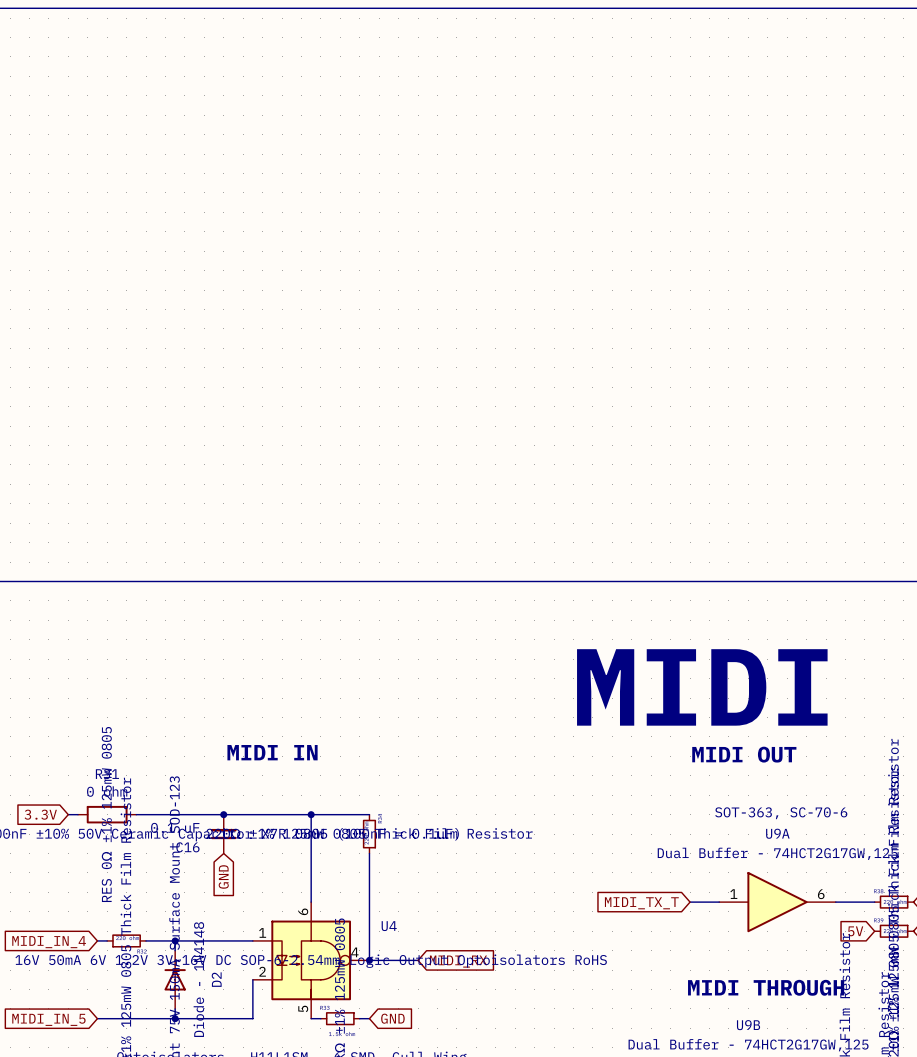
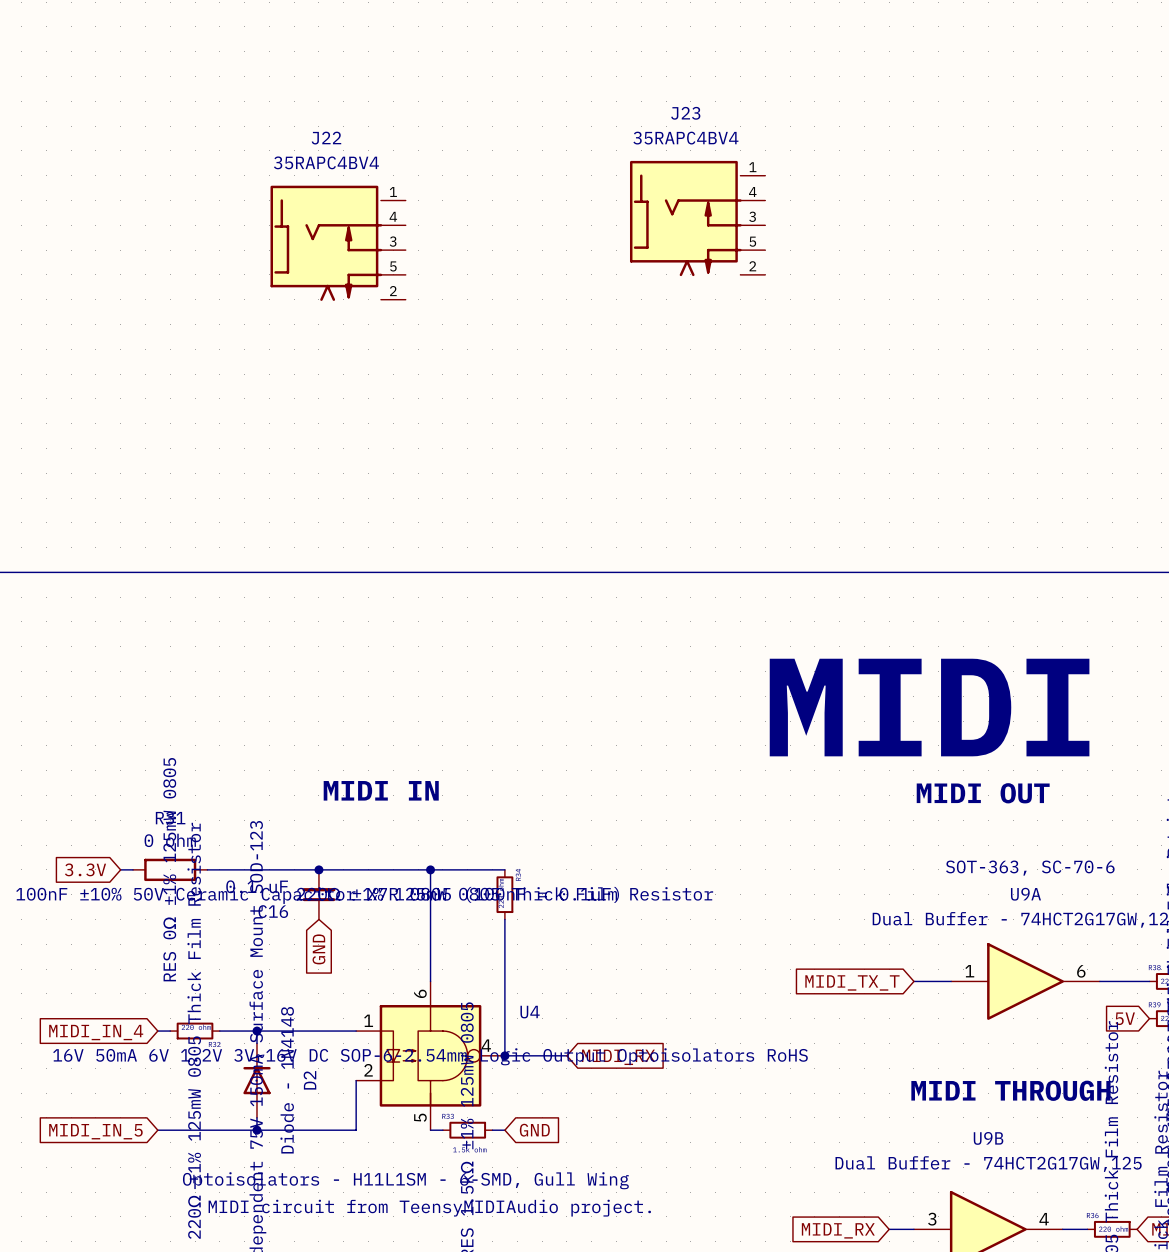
J23: none -> 35RAPC4BV4 (697, 218)
J22: none -> 35RAPC4BV4 (338, 243)

